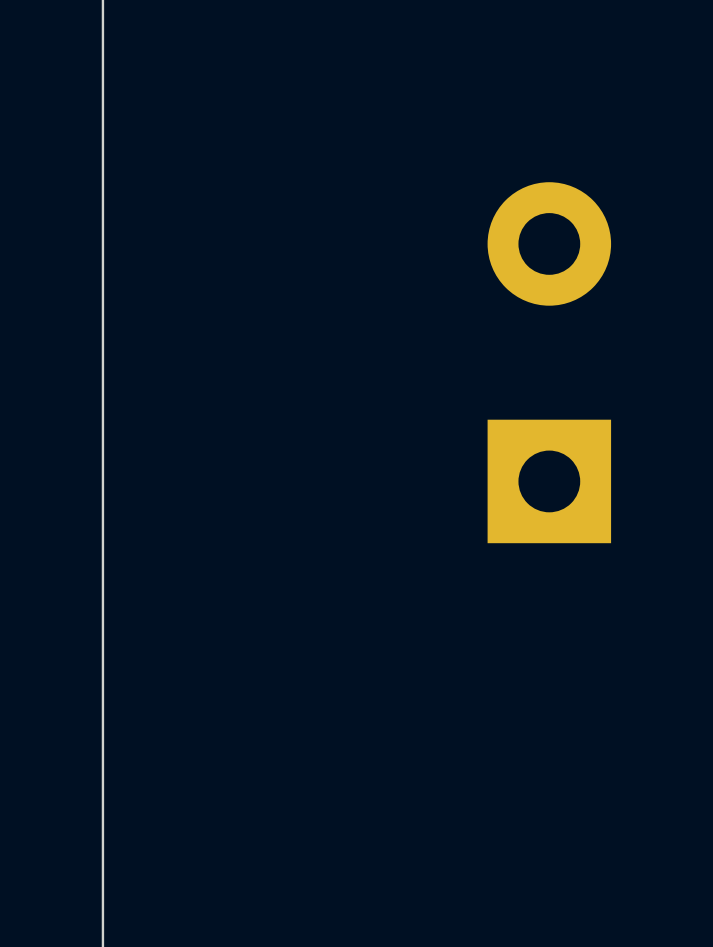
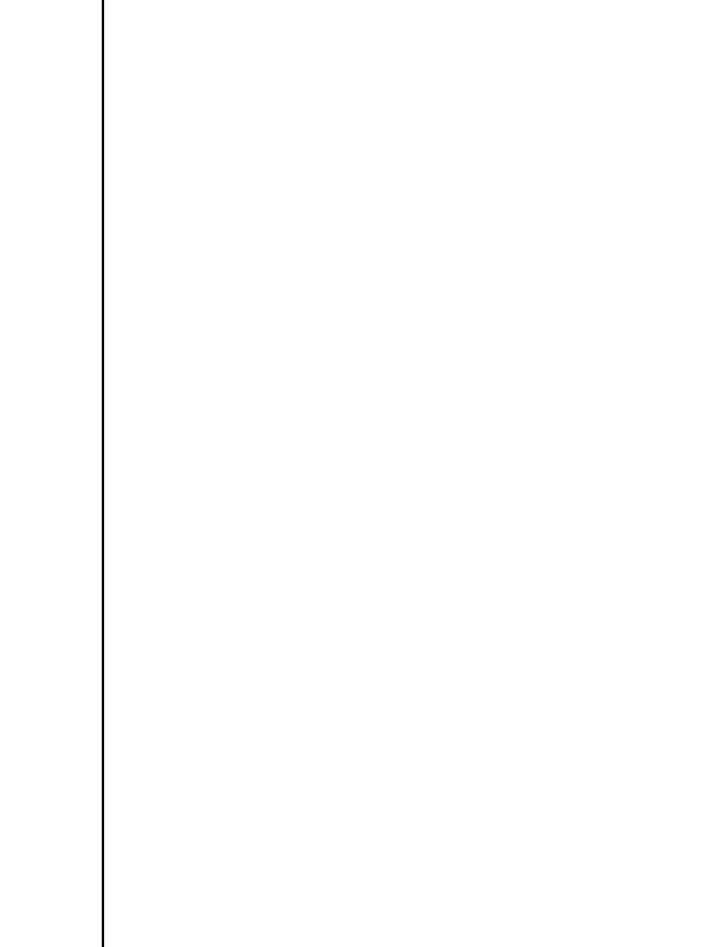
part: (549, 362) -> none

